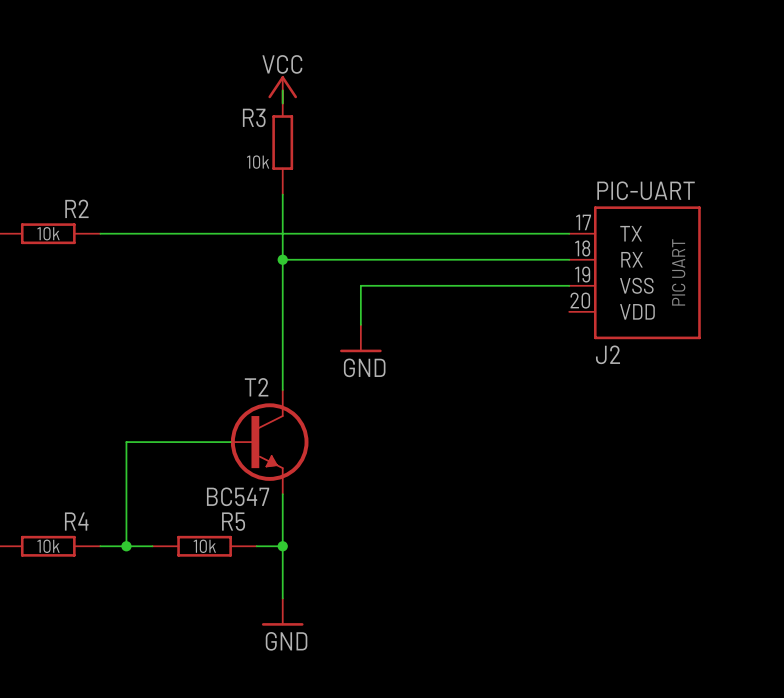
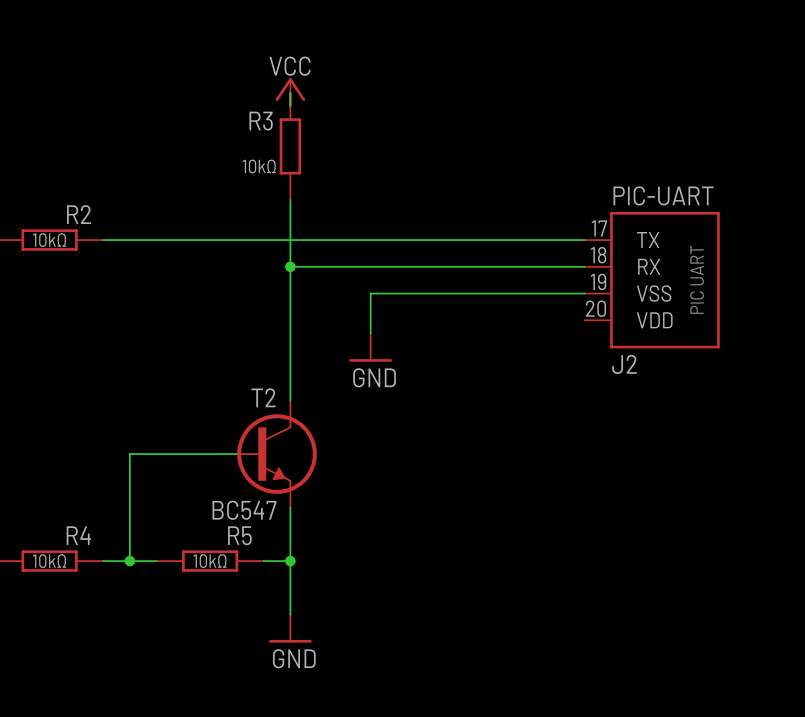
R3 value: 10k (258, 162) -> 10kΩ (259, 166)
R2 value: 10k (48, 233) -> 10kΩ (49, 240)
R4 value: 10k (48, 546) -> 10kΩ (49, 561)
R5 value: 10k (204, 546) -> 10kΩ (210, 561)

